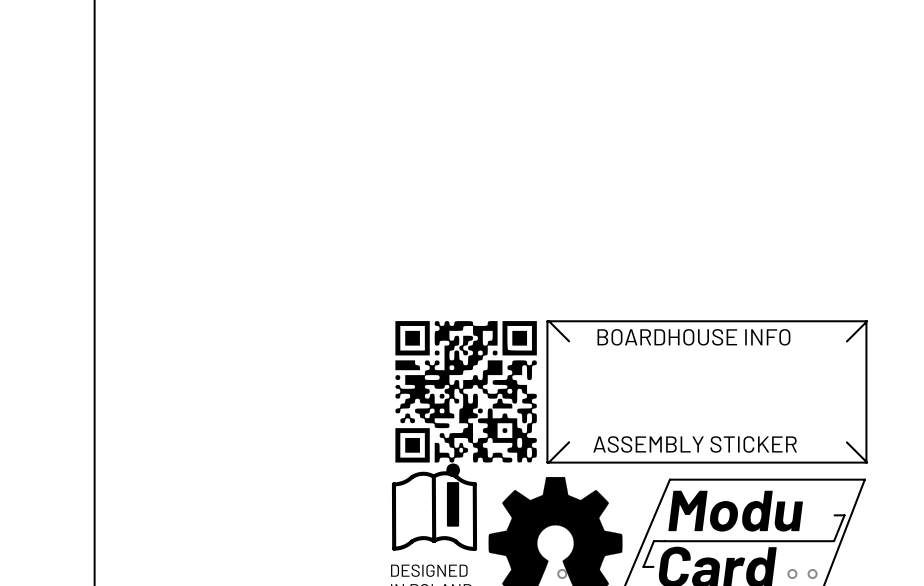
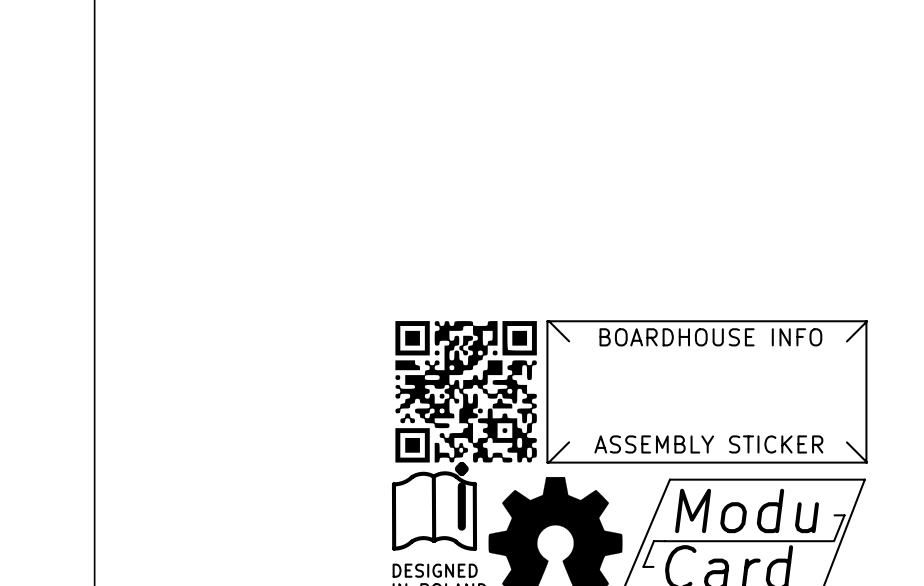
via: (562, 574) -> none
via: (792, 574) -> none
via: (812, 574) -> none

